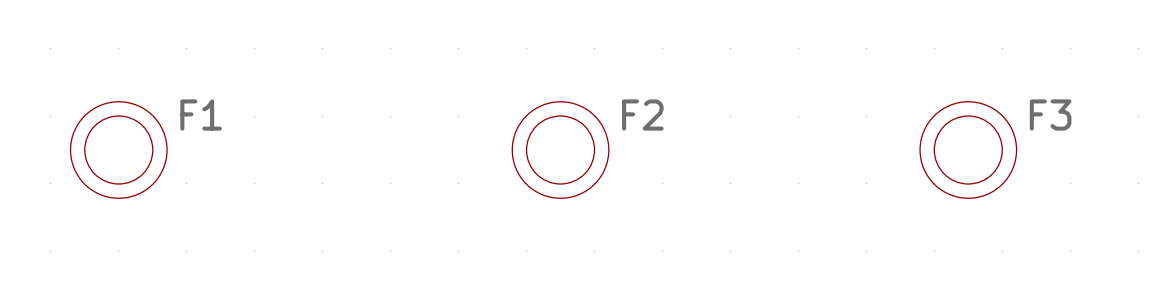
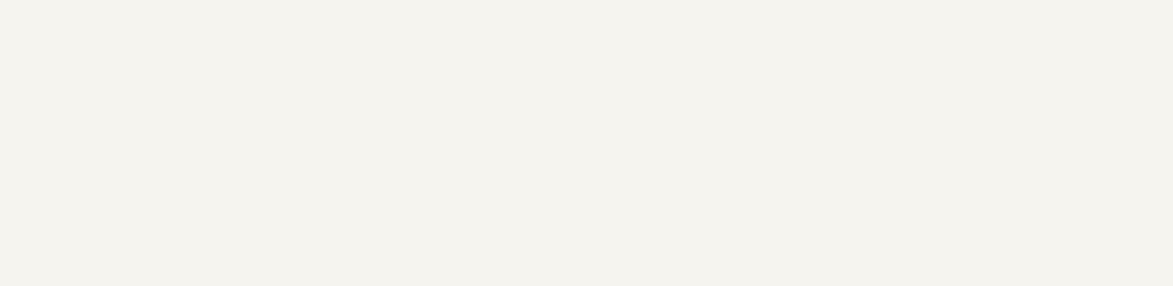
F1: (118, 150) -> none
F2: (560, 150) -> none
F3: (968, 150) -> none

